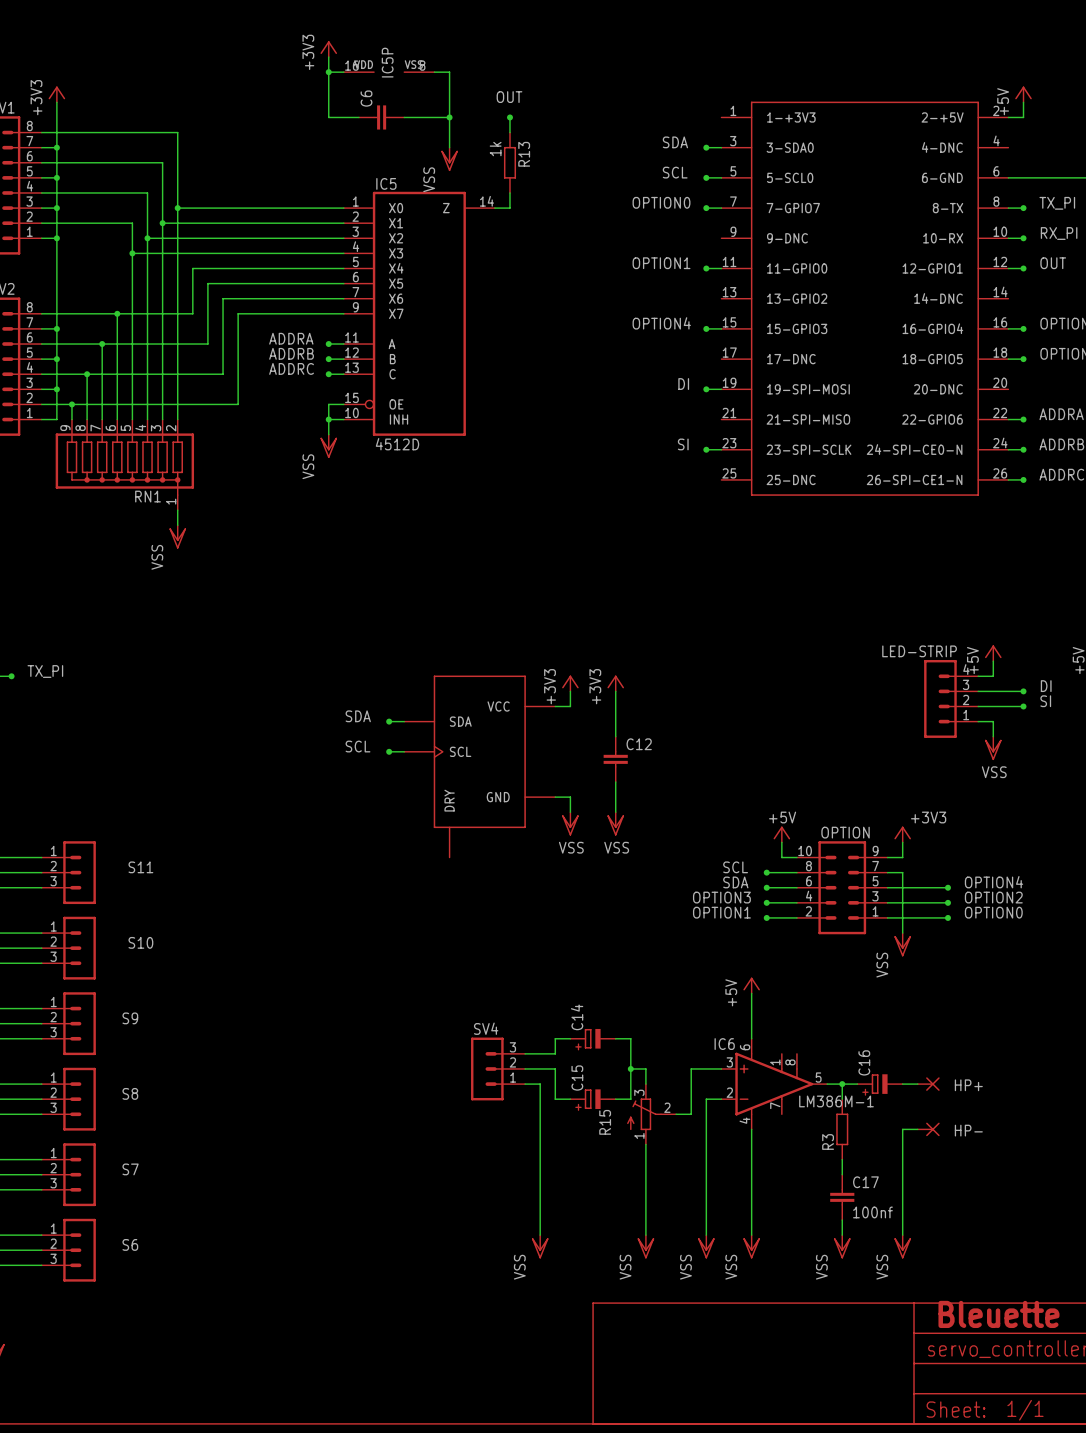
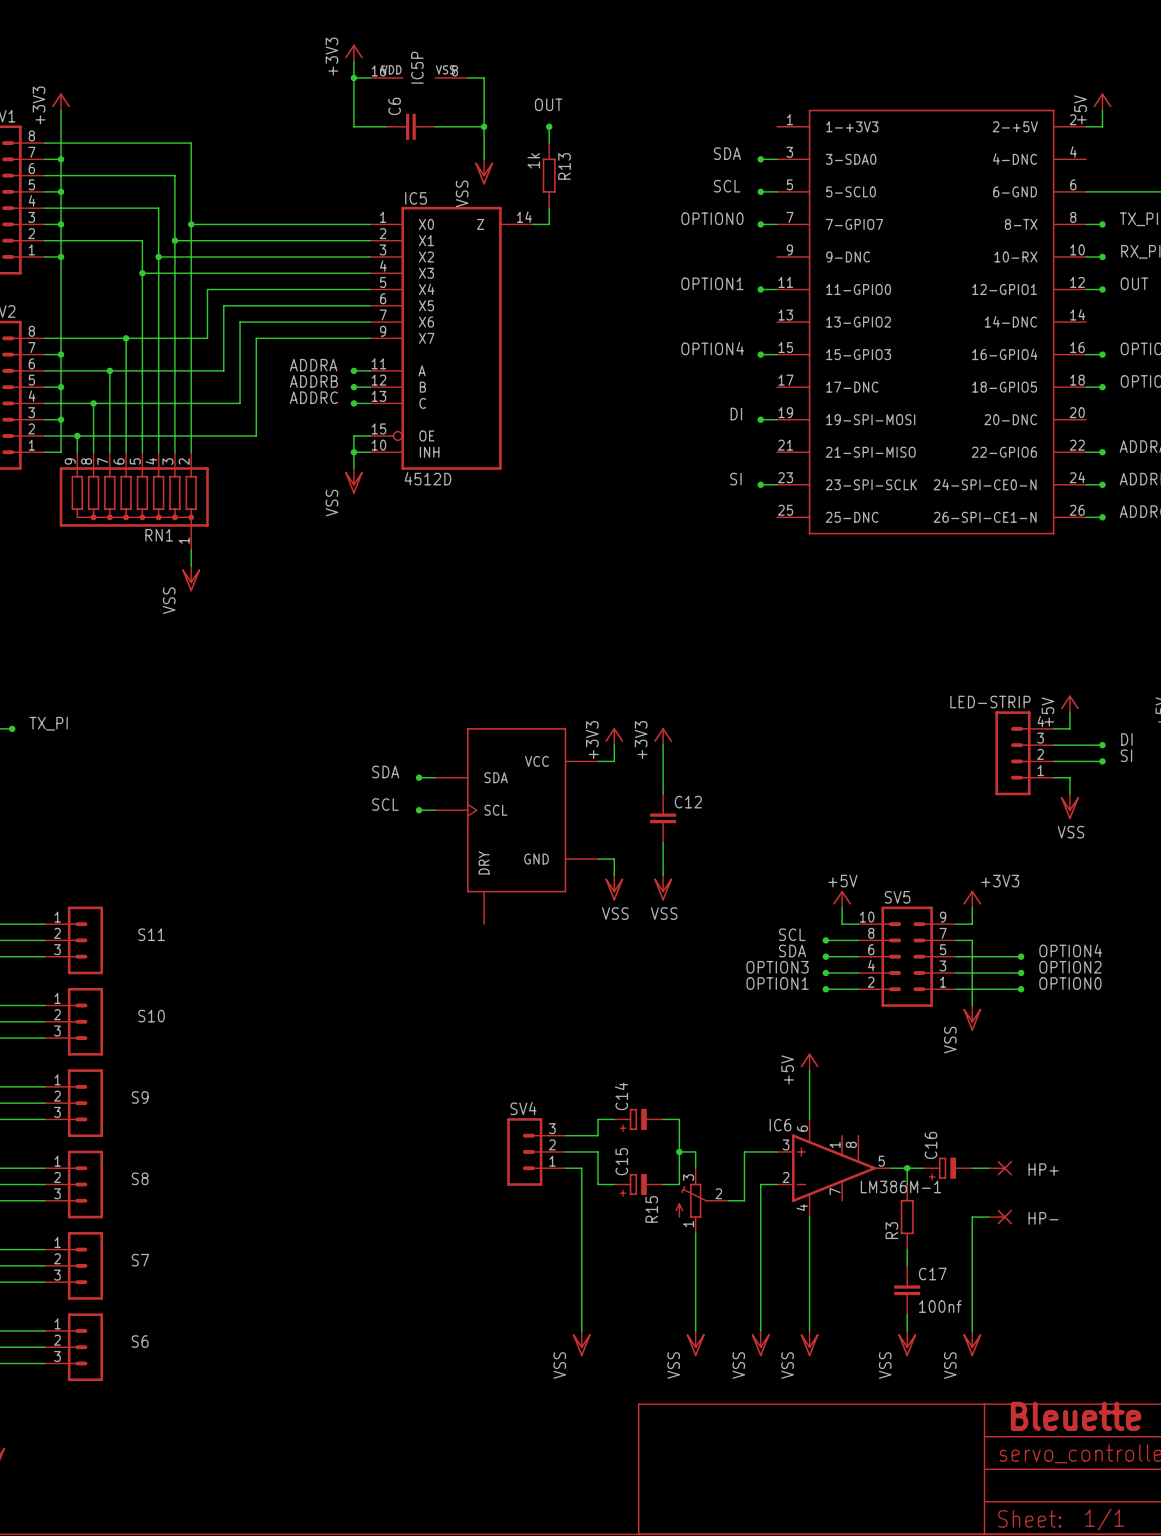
OPTION name: OPTION (845, 832) -> SV5 (897, 897)

